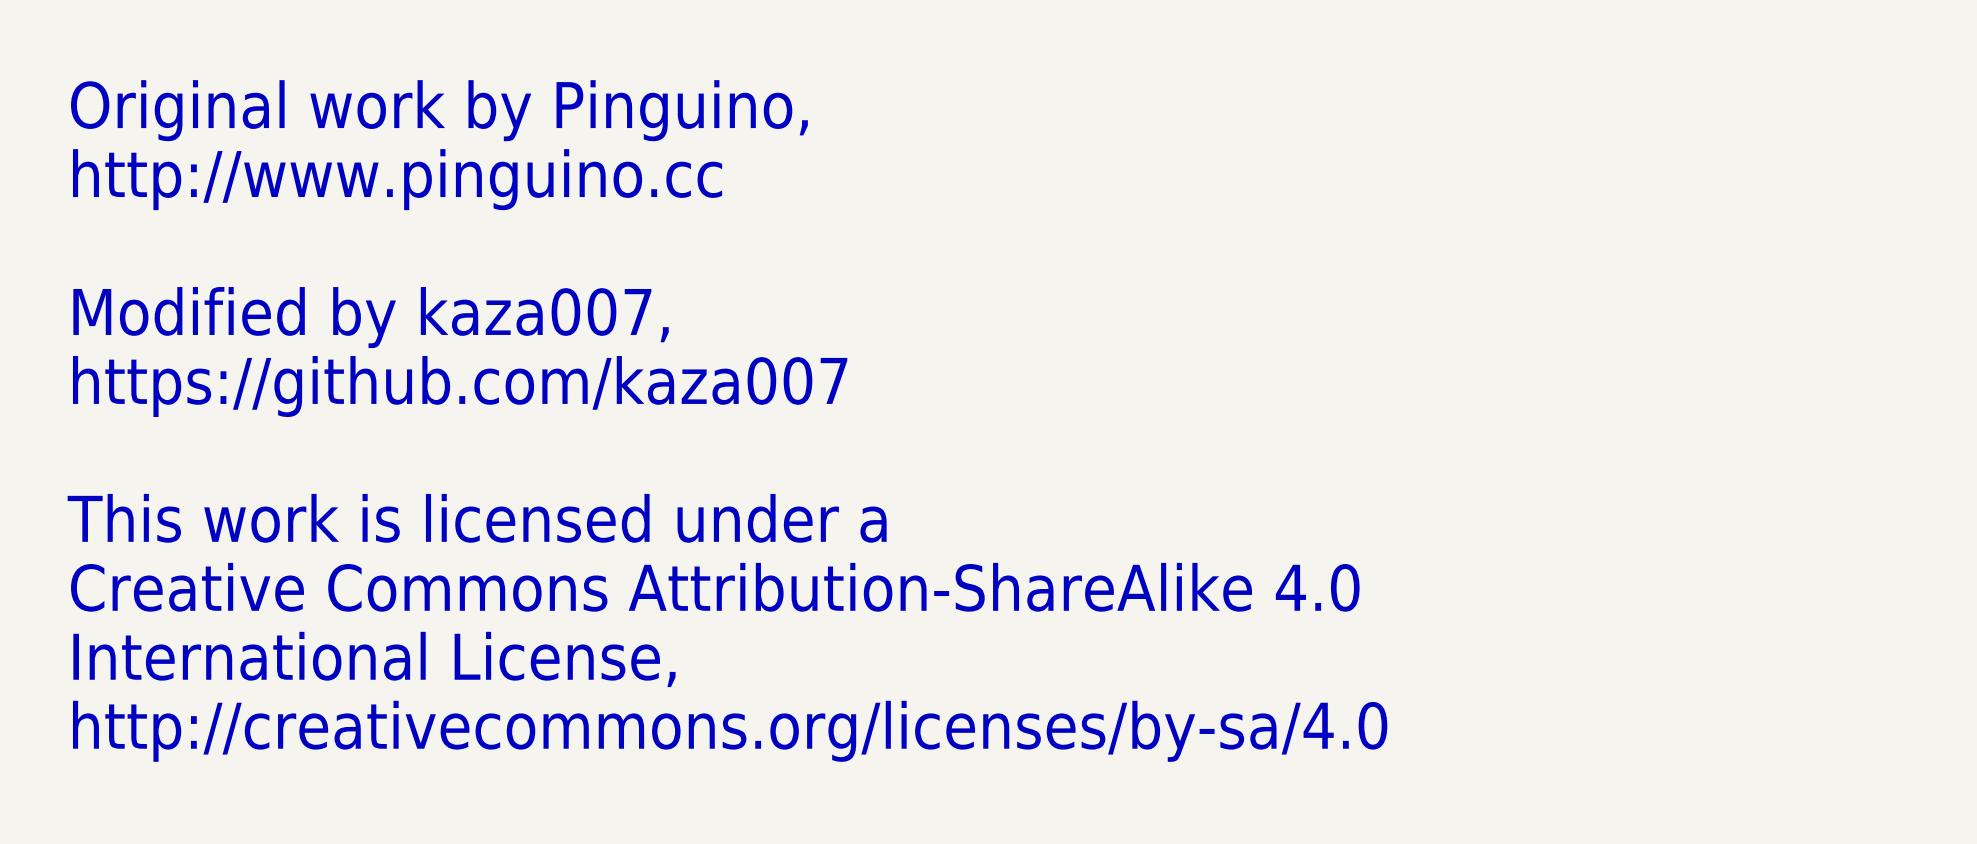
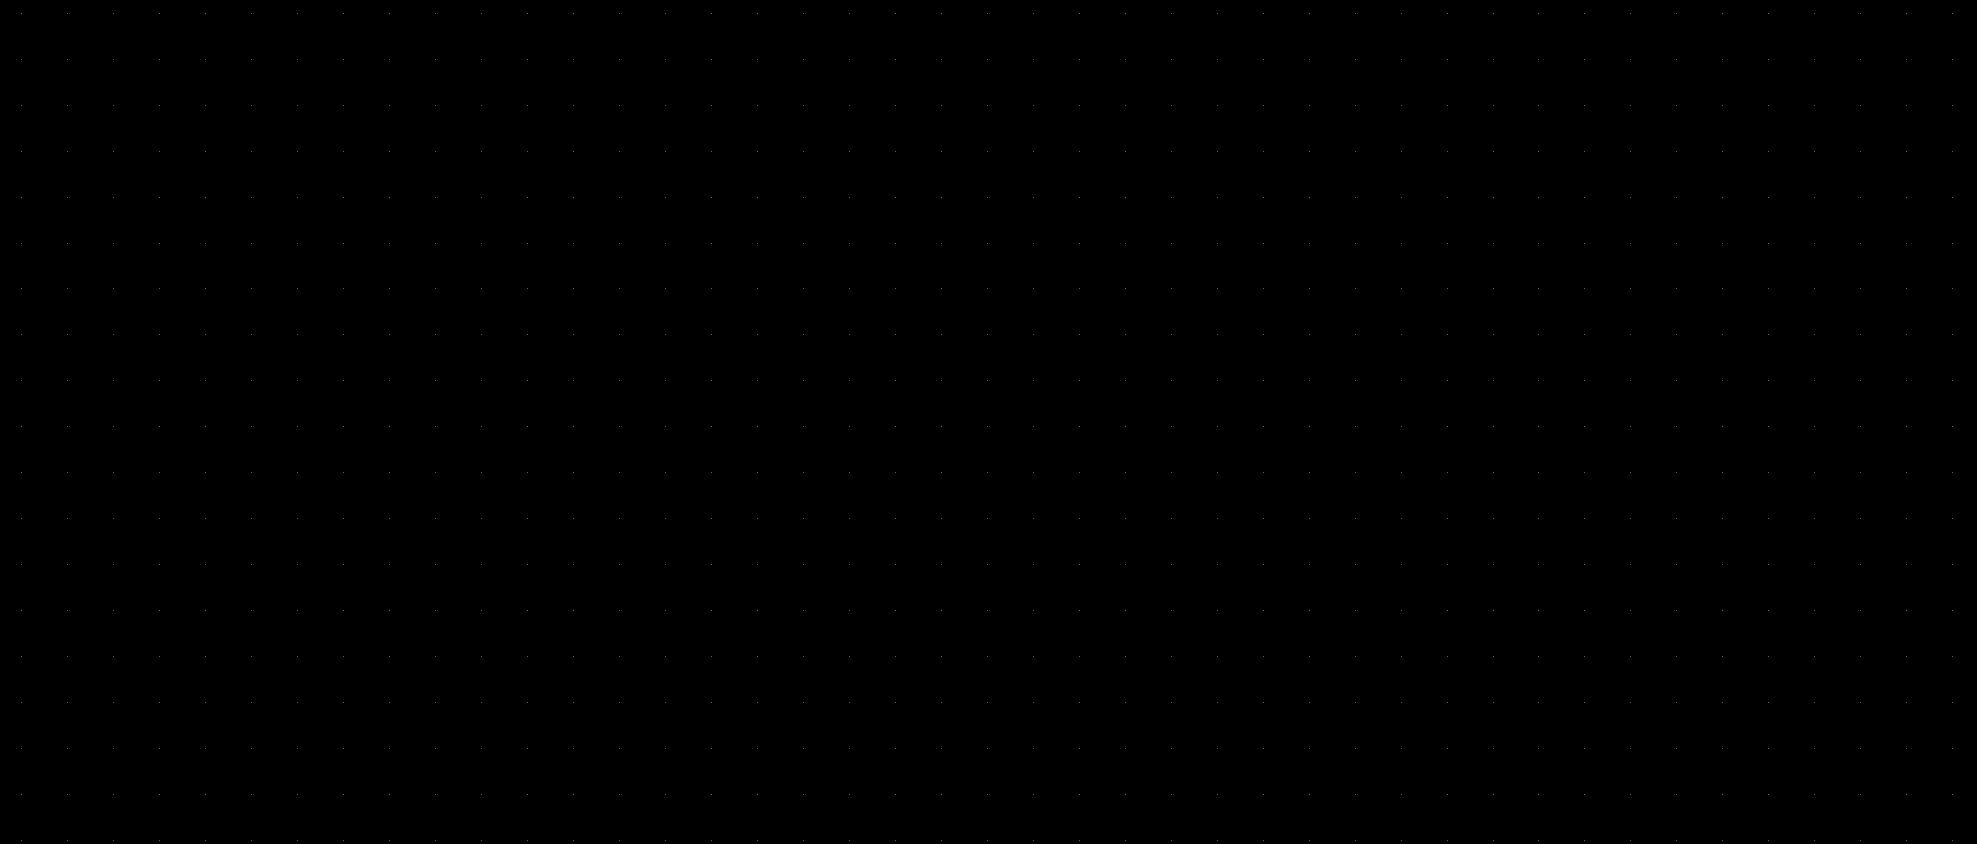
text: Original work by Pinguino, (439, 110) -> none
text: http://www.pinguino.cc (397, 179) -> none
text: Modified by kaza007, (371, 317) -> none
text: https://github.com/kaza007 (460, 386) -> none
text: This work is licensed under a (477, 518) -> none
text: Creative Commons Attribution-ShareAlike 4.0 (715, 587) -> none
text: International License, (374, 659) -> none
text: http://creativecommons.org/licenses/by-sa/4.0 (730, 731) -> none

